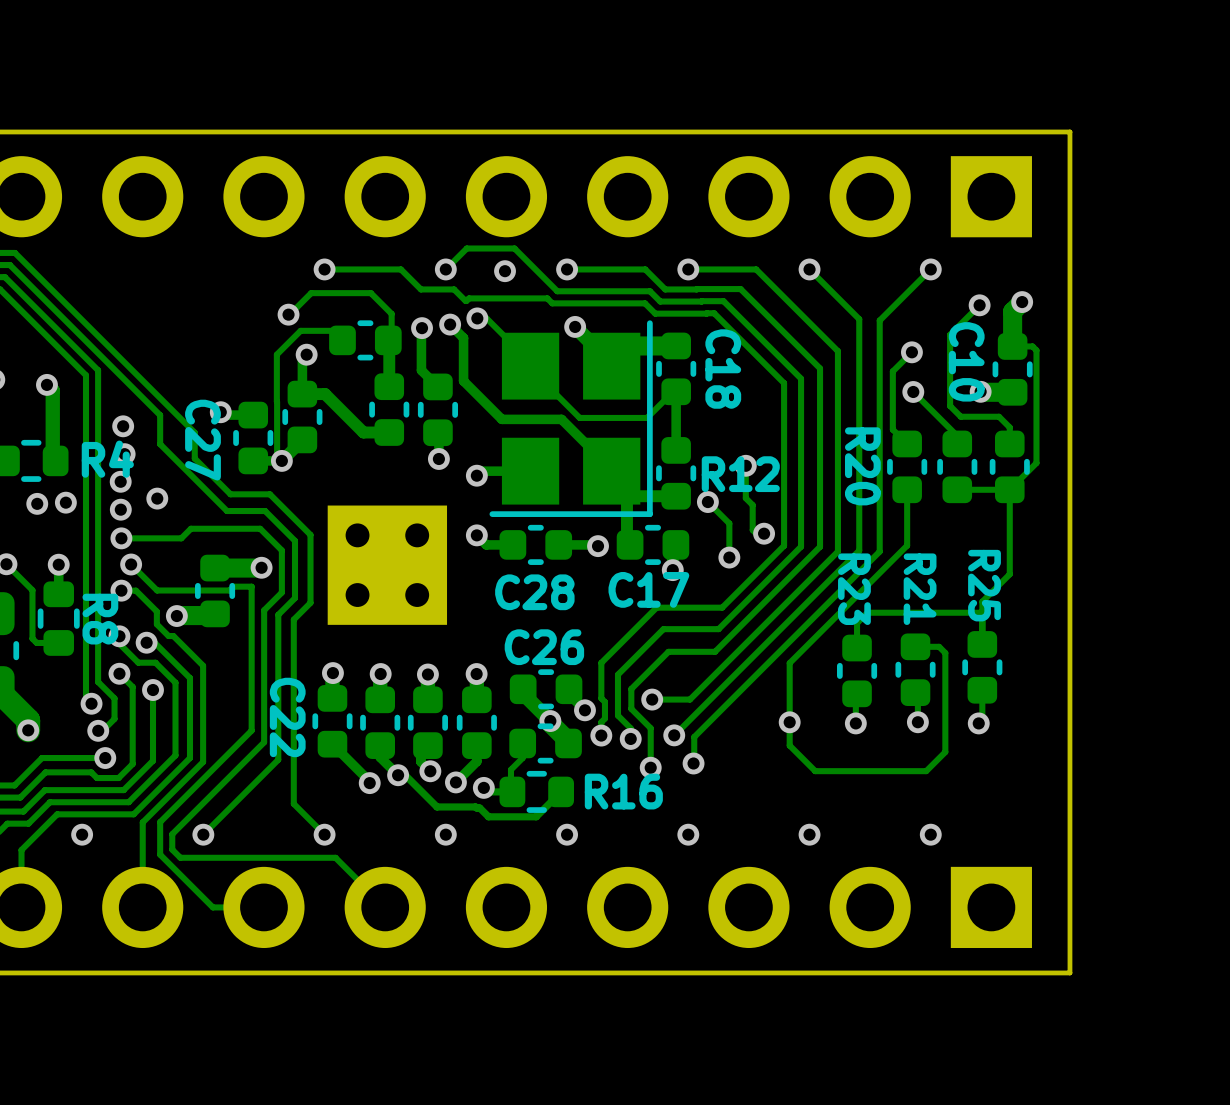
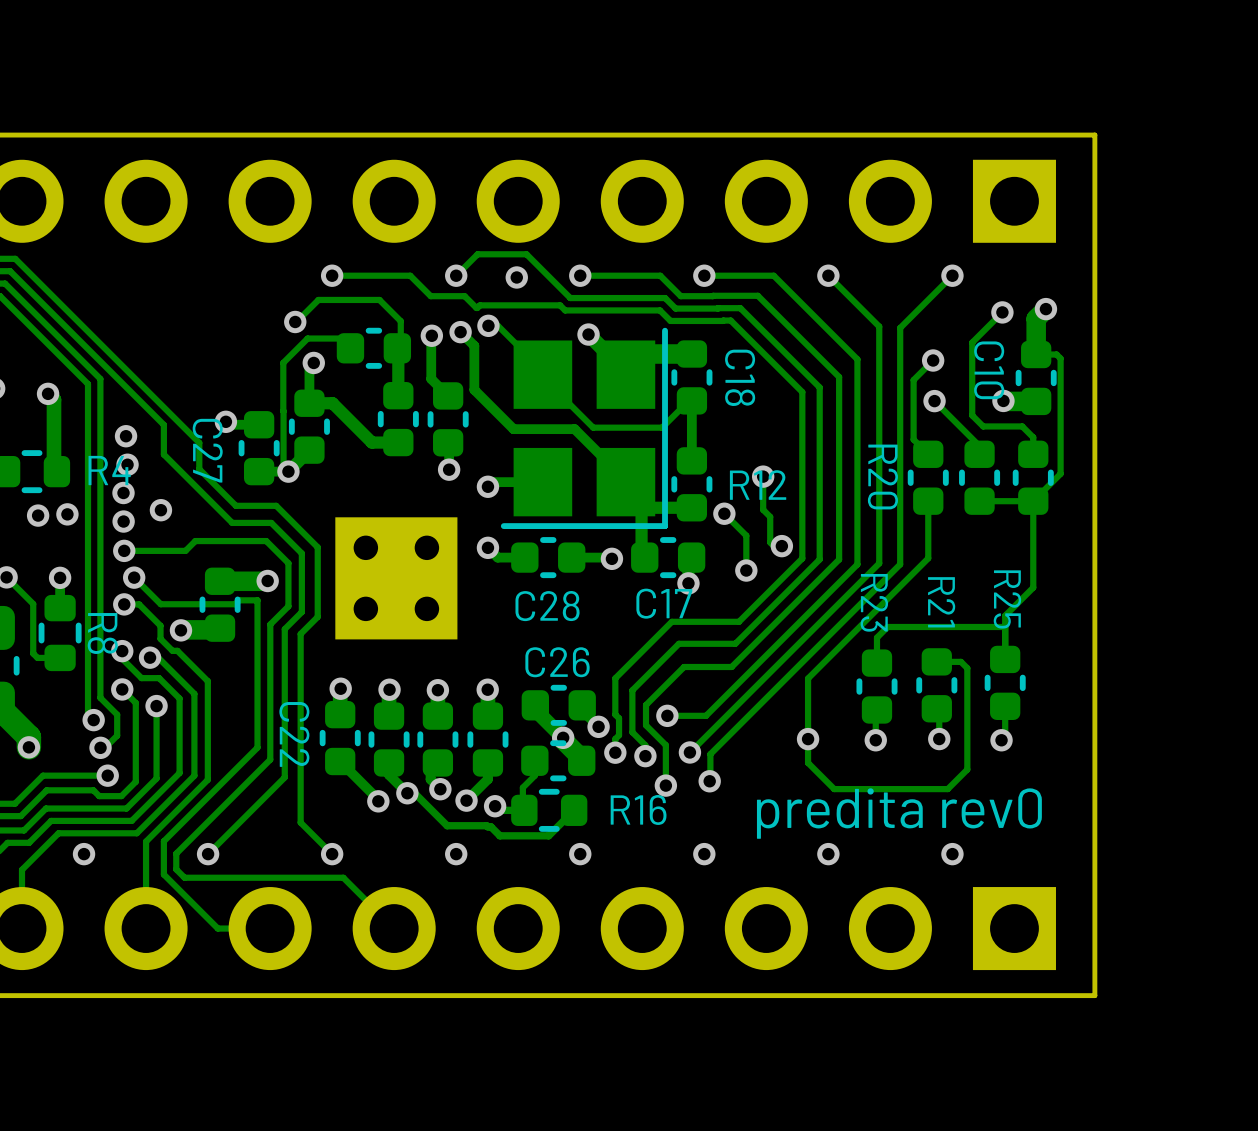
text: none -> predita rev0 (899, 813)

